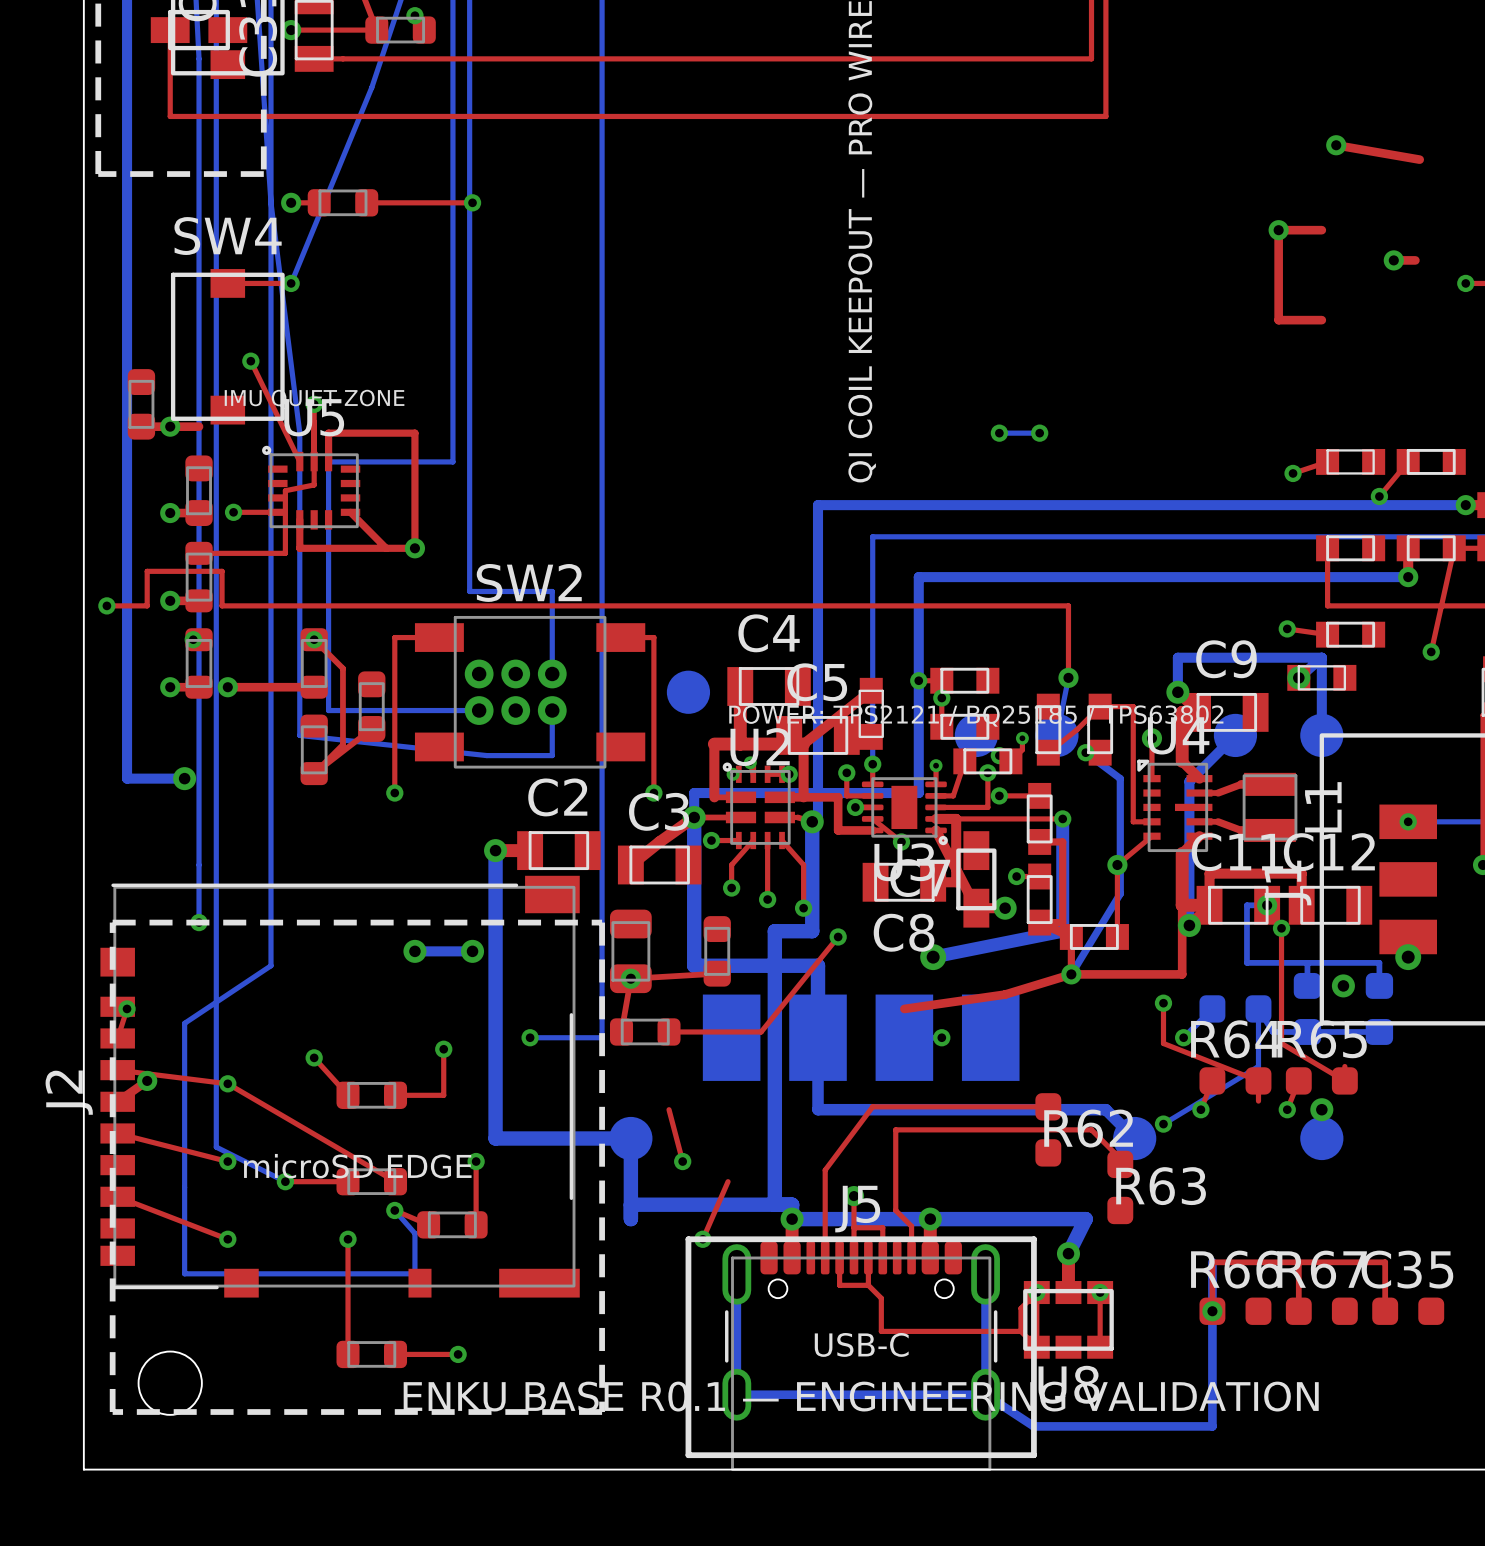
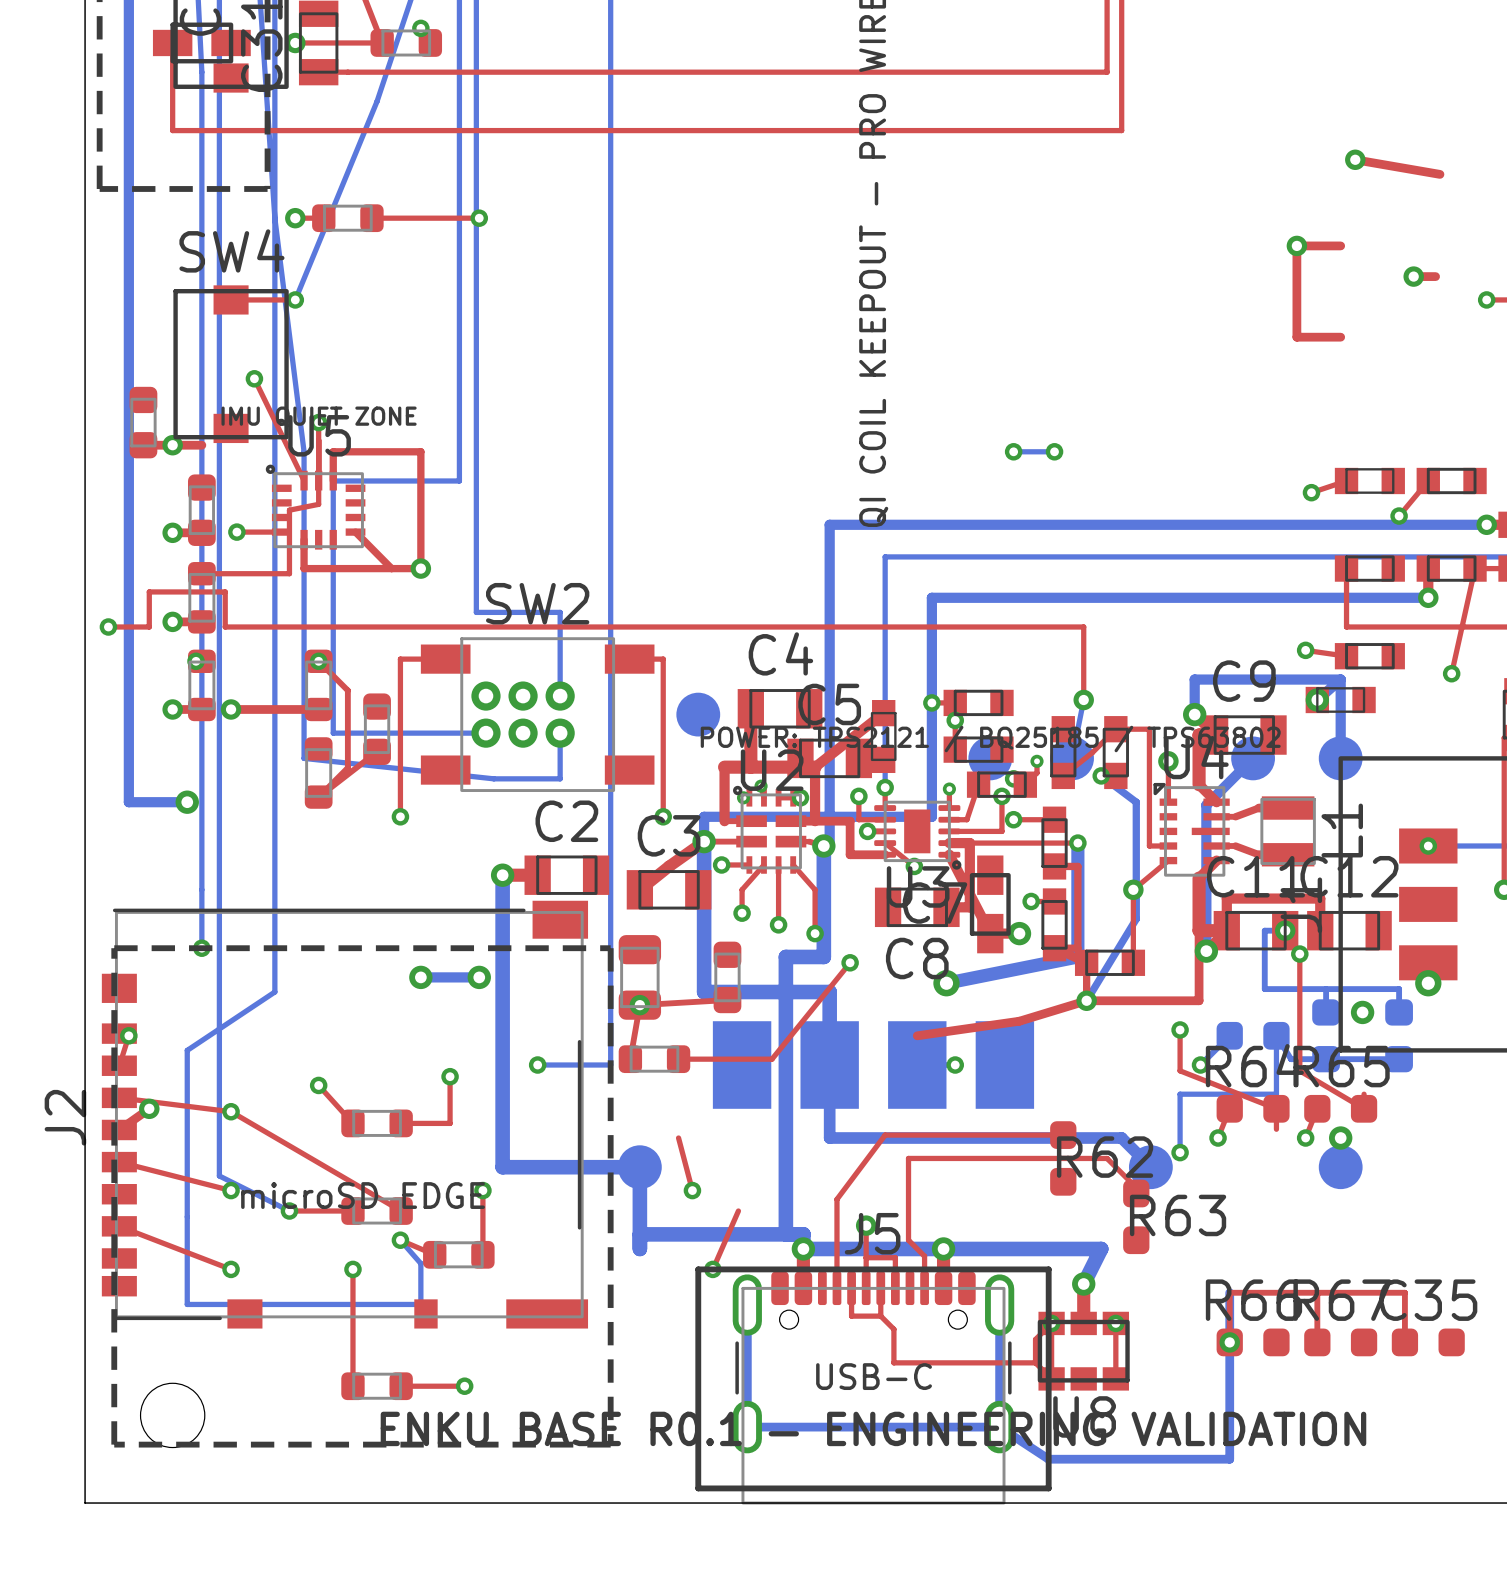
bottom track: (1258, 1066) (1163, 1124) -> (1276, 1094) (1180, 1094) (1180, 1152)

